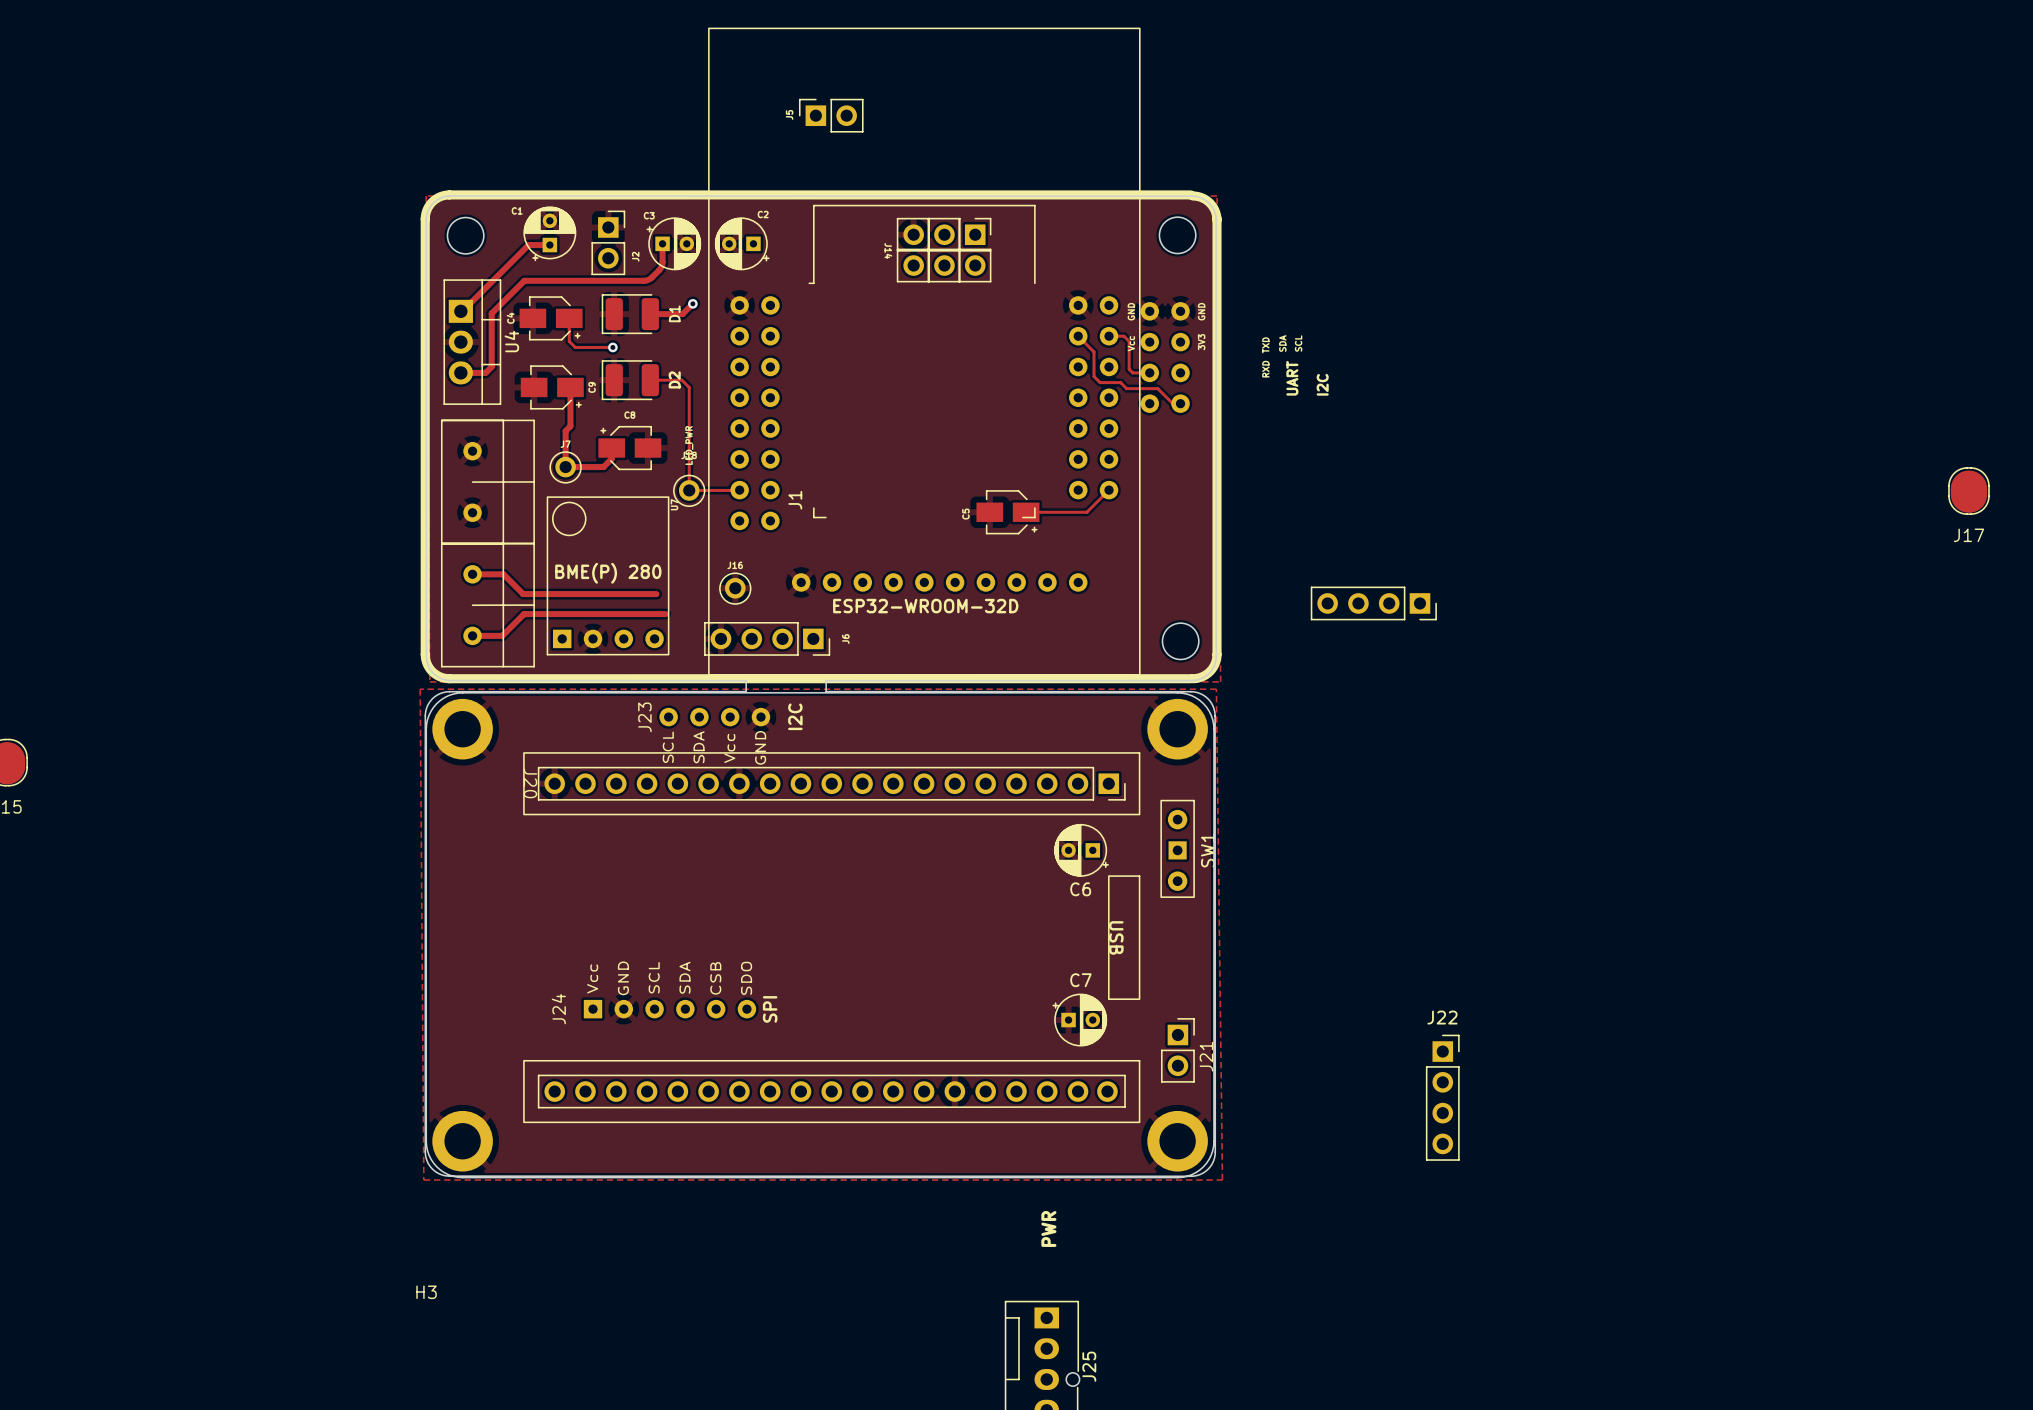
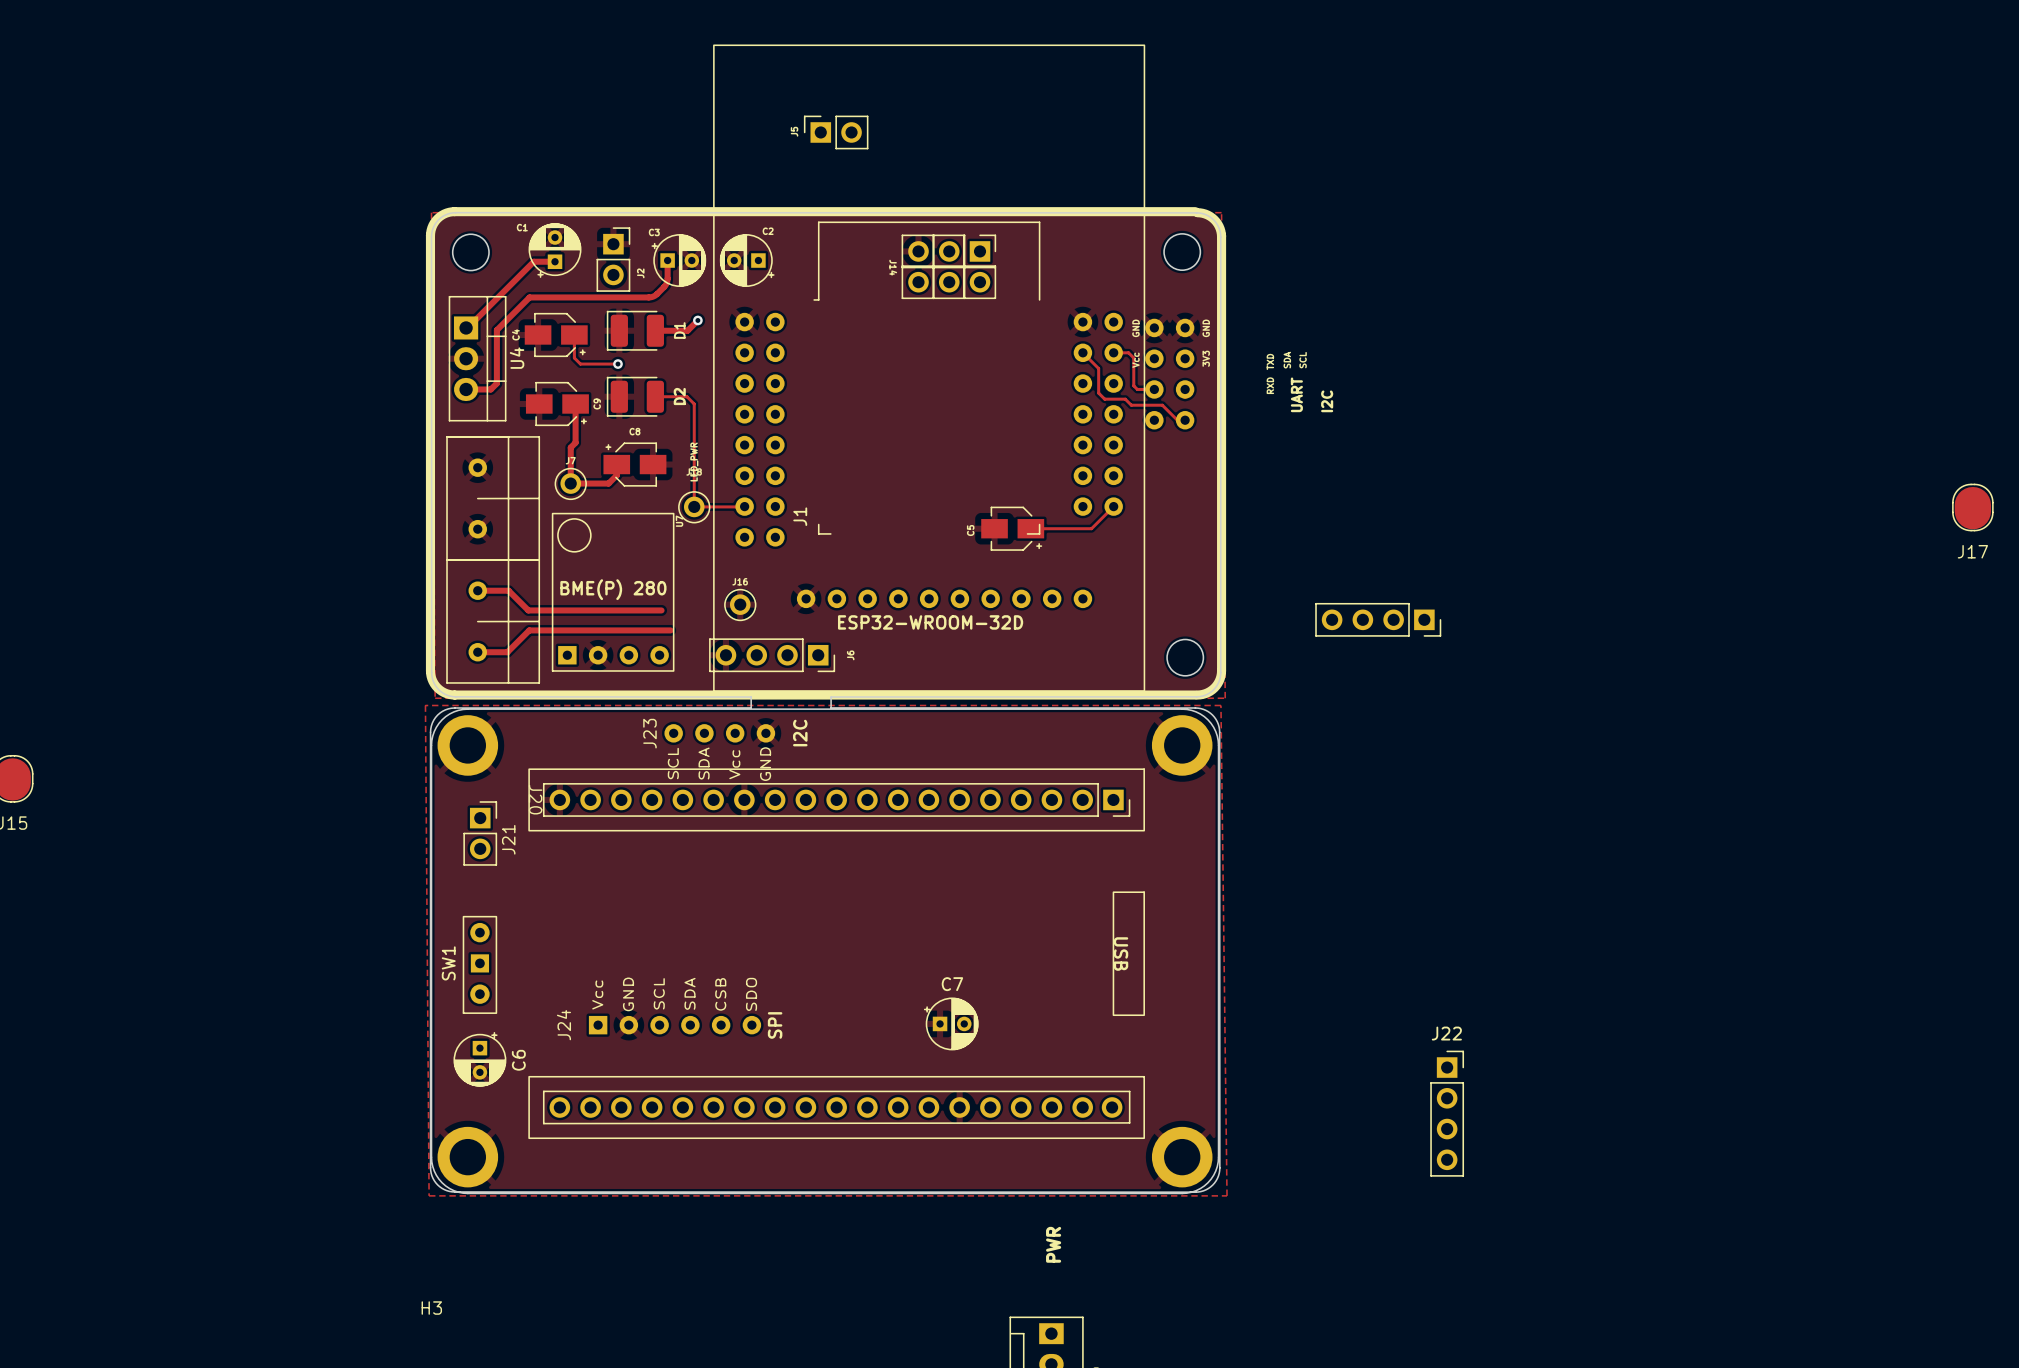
SW1 rotation: 0° (1177, 848) -> 180° (479, 964)
SW1 position: (1177, 848) -> (479, 964)
C6 rotation: 0° (1081, 850) -> 90° counterclockwise (479, 1059)
C6 position: (1081, 850) -> (479, 1059)
C7 position: (1079, 1020) -> (951, 1023)
J21 position: (1177, 1050) -> (480, 833)

